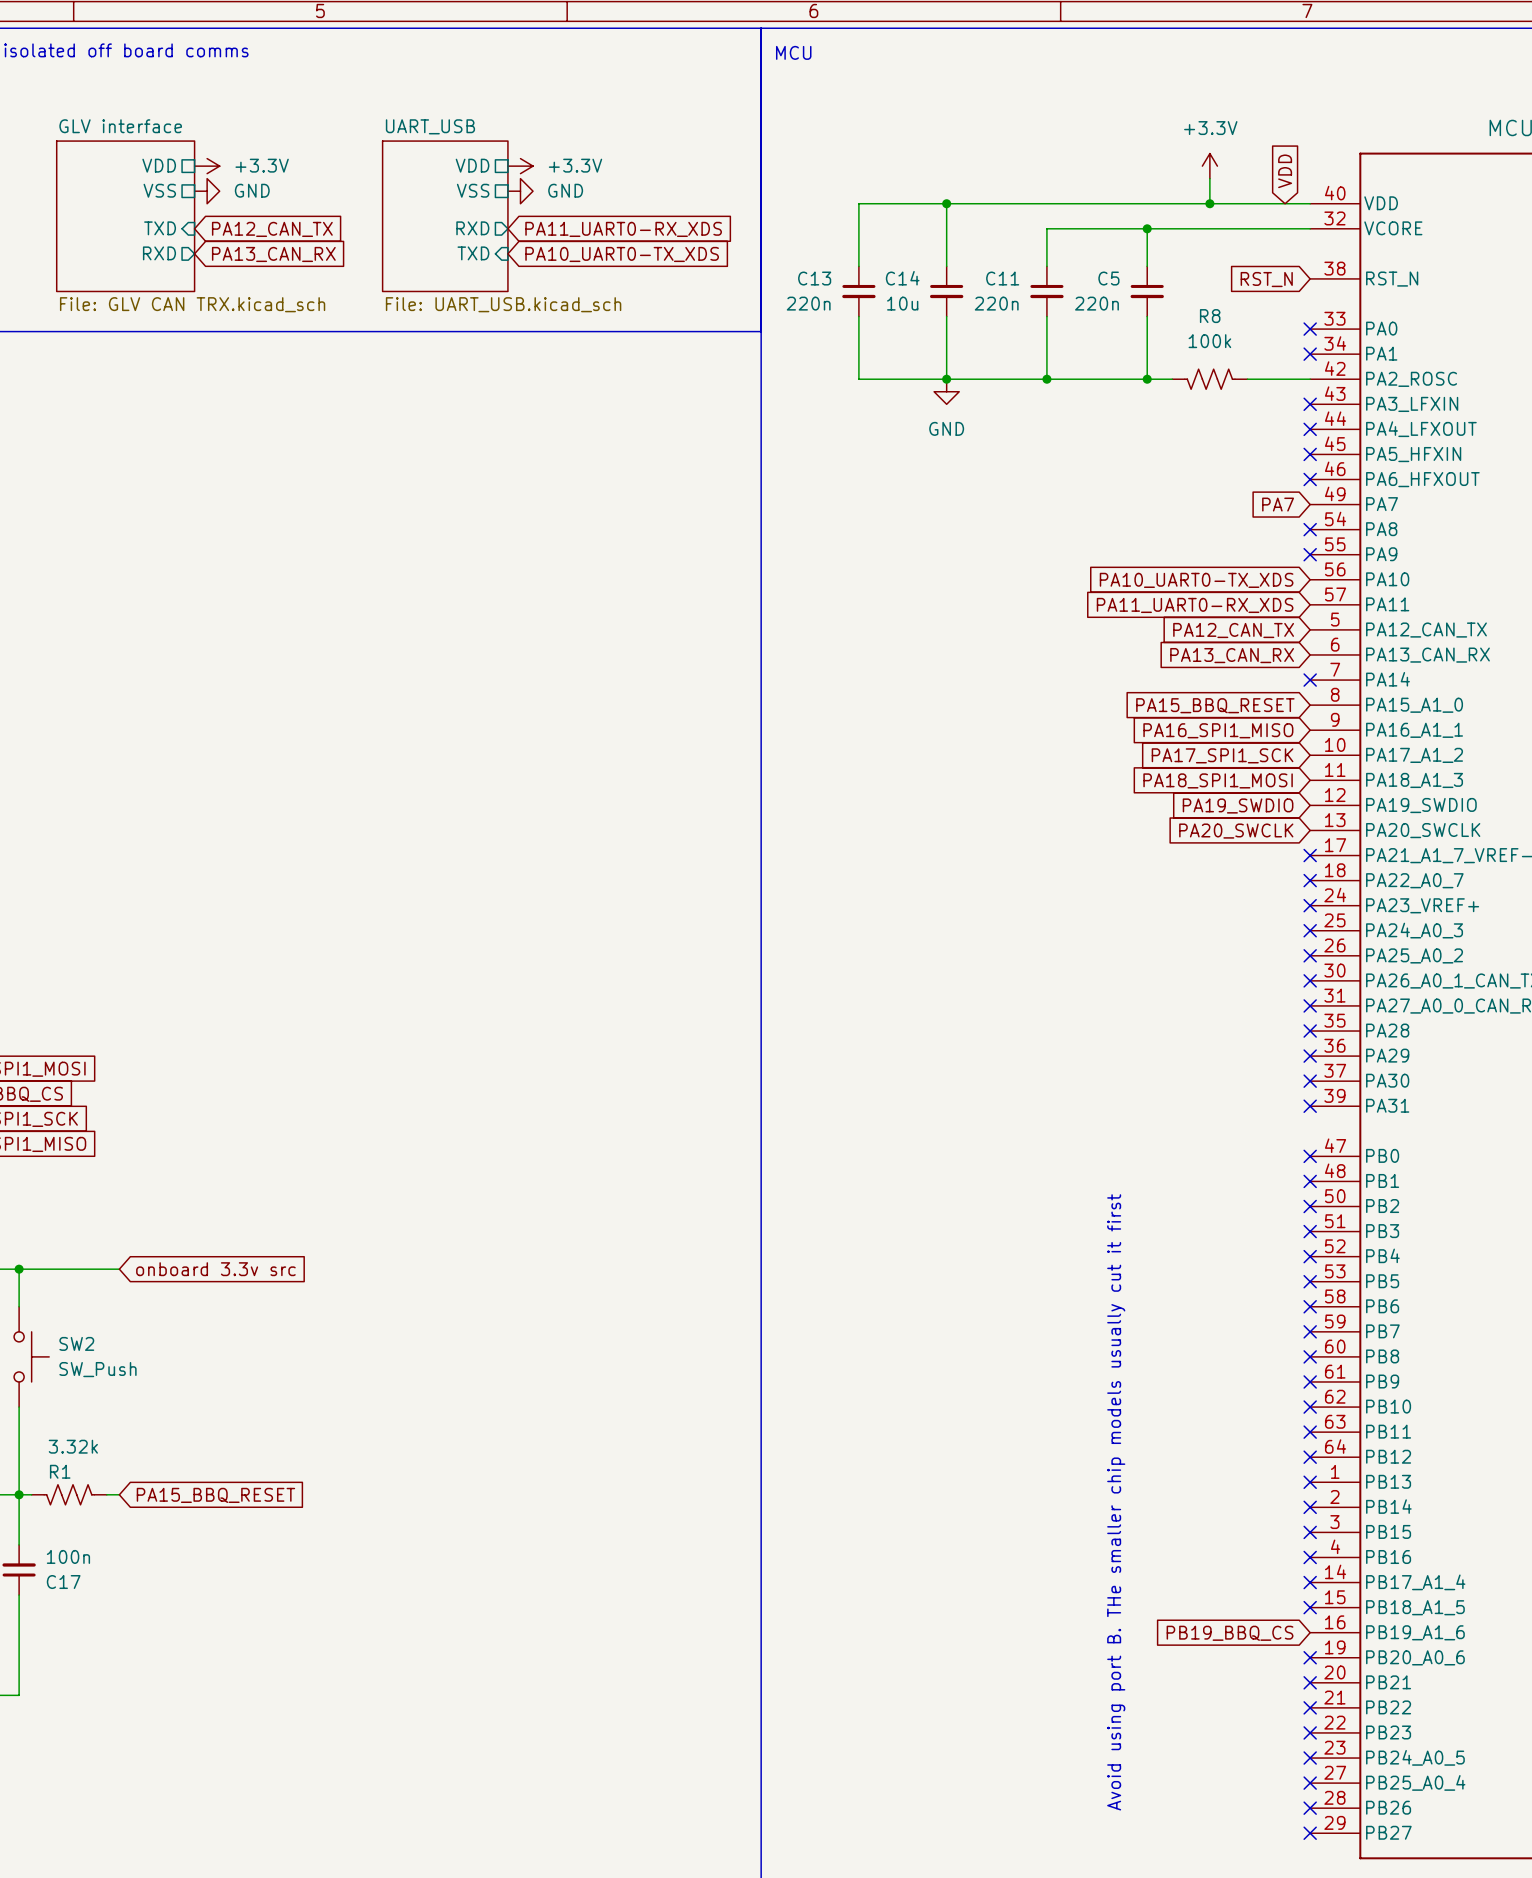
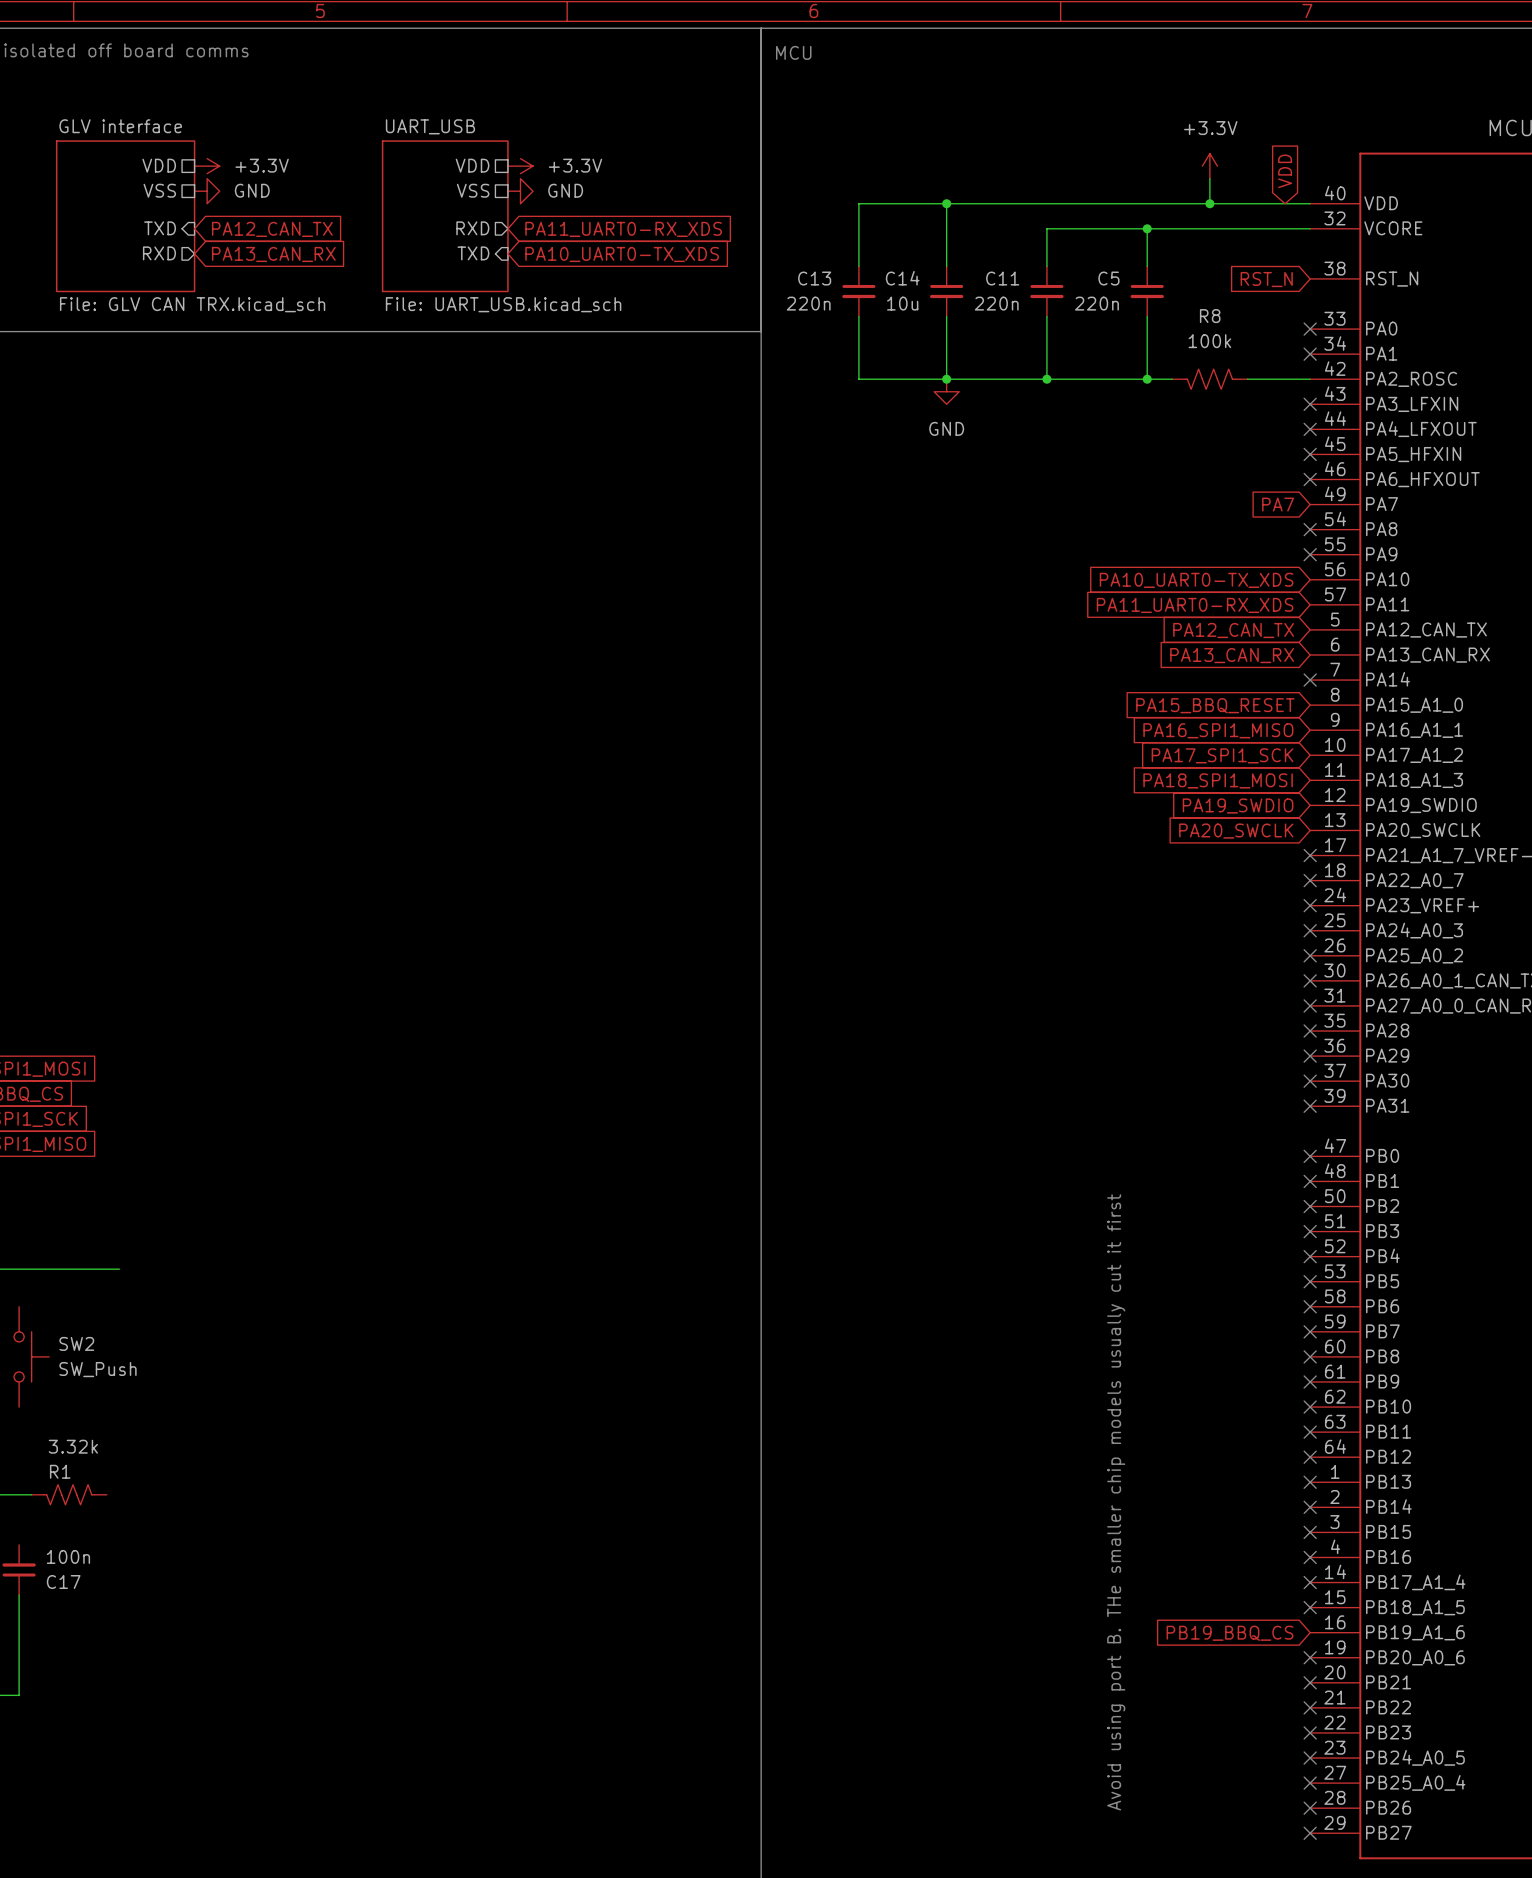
wire: (19, 1269) (19, 1306) -> none
junction: (19, 1269) -> none
global label: onboard 3.3v src (215, 1269) -> none
wire: (19, 1407) (19, 1544) -> none
junction: (19, 1494) -> none
wire: (106, 1494) (119, 1494) -> none
global label: PA15_BBQ_RESET (215, 1495) -> none

